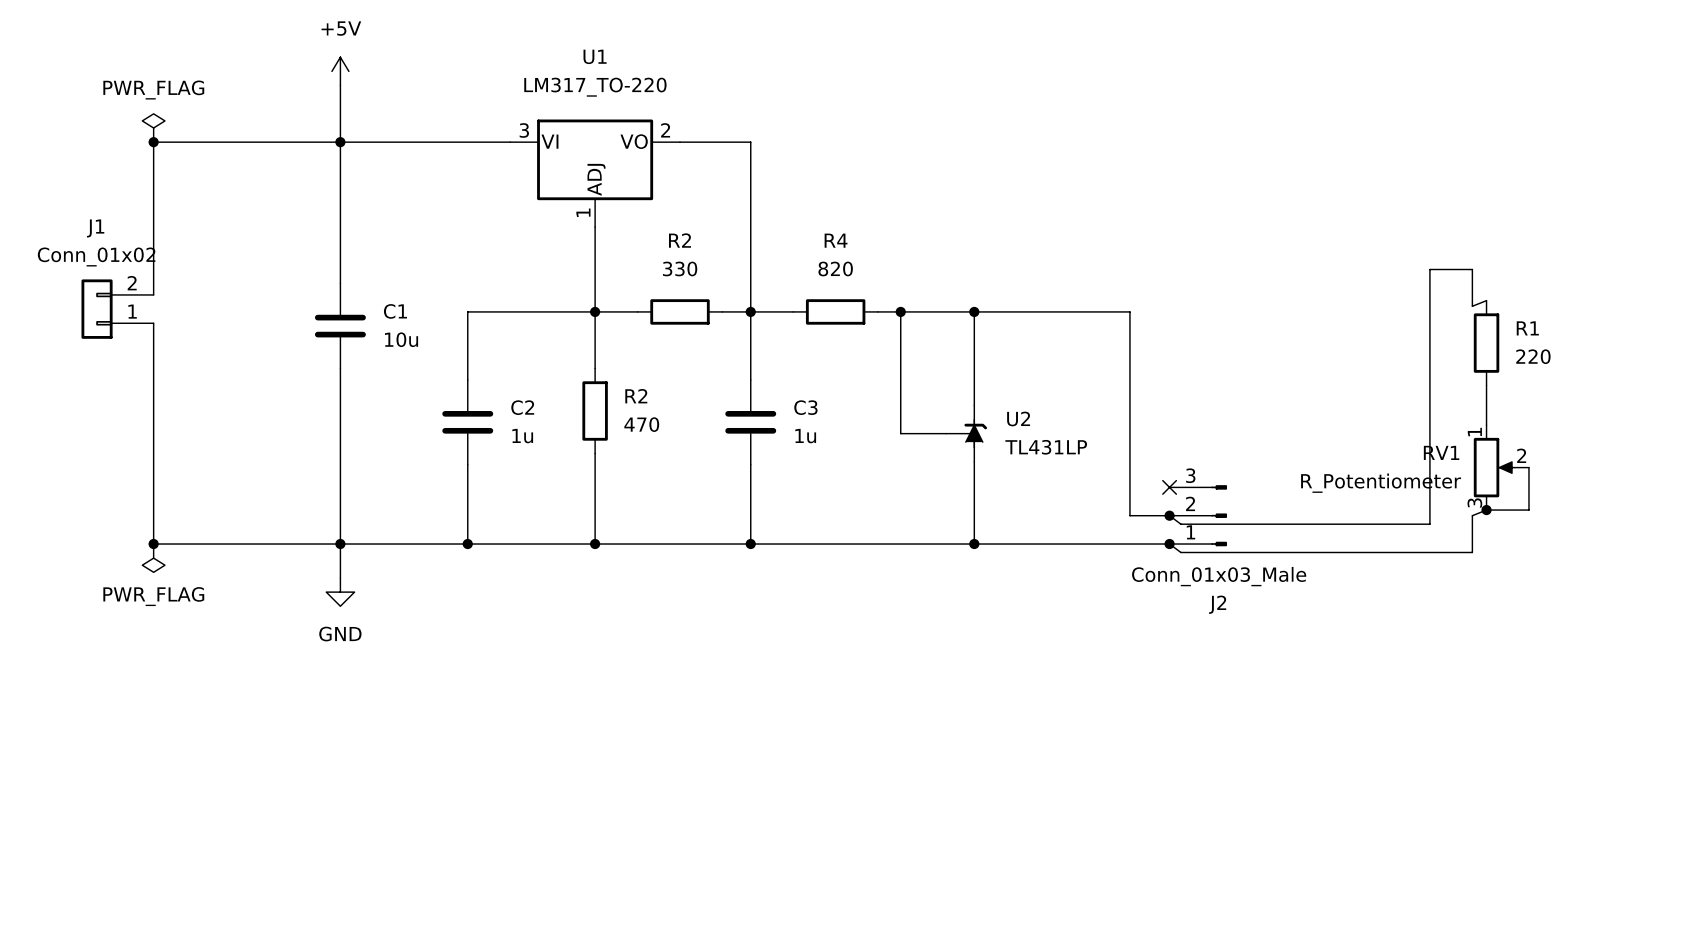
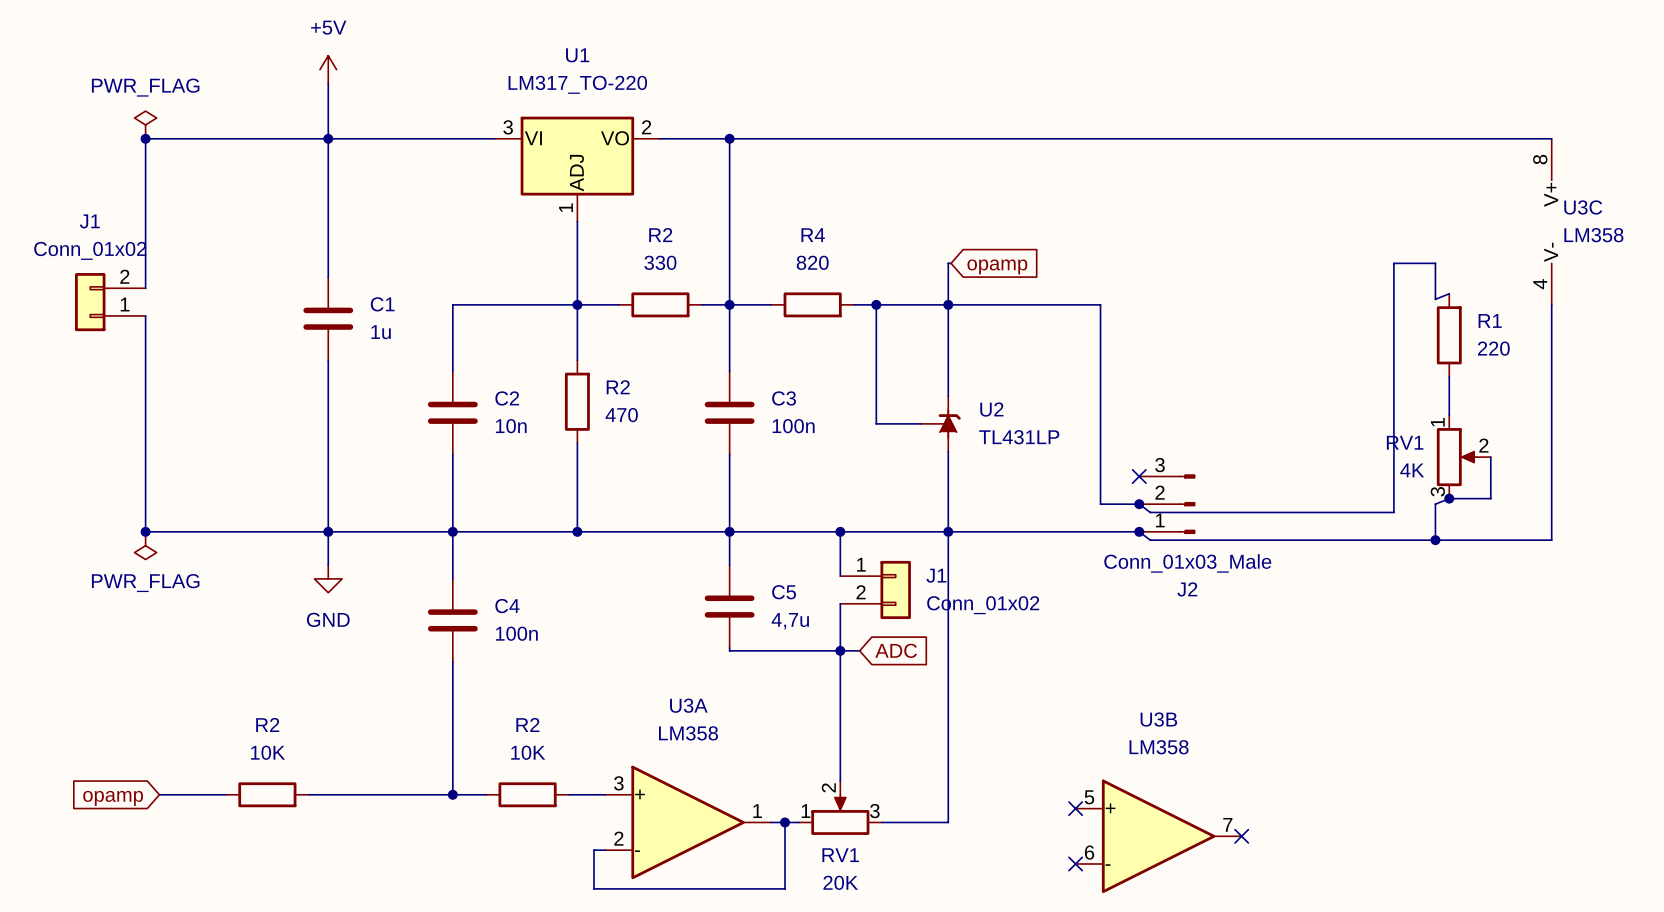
wire: none -> (729, 138) (1551, 138)
junction: none -> (729, 138)
U3C: none -> LM358 (1551, 221)
wire: none -> (951, 263) (948, 263) (948, 304)
global label: none -> opamp (997, 266)
wire: none -> (1551, 304) (1551, 540) (1435, 540)
C1 value: 10u (401, 339) -> 1u (381, 332)
C2 value: 1u (522, 436) -> 10n (511, 426)
C3 value: 1u (805, 436) -> 100n (793, 426)
RV1 value: R_Potentiometer (1381, 483) -> 4K (1412, 470)
wire: none -> (452, 531) (452, 578)
wire: none -> (729, 531) (729, 565)
wire: none -> (840, 531) (840, 576)
junction: none -> (840, 531)
wire: none -> (948, 531) (948, 822) (881, 822)
junction: none -> (1435, 540)
J1: none -> Conn_01x02 (875, 589)
wire: none -> (840, 603) (840, 780)
C5: none -> 4,7u (729, 606)
C4: none -> 100n (452, 620)
wire: none -> (729, 648) (729, 650) (859, 650)
junction: none -> (840, 650)
global label: none -> ADC (896, 650)
wire: none -> (452, 661) (452, 794)
wire: none -> (159, 794) (225, 794)
R2: none -> 10K (267, 794)
wire: none -> (308, 794) (486, 794)
junction: none -> (452, 794)
R2: none -> 10K (527, 794)
wire: none -> (569, 794) (605, 794)
global label: none -> opamp (113, 798)
RV1: none -> 20K (840, 807)
no-connect mark: none -> (1075, 808)
U3A: none -> LM358 (688, 822)
wire: none -> (771, 822) (798, 822)
wire: none -> (784, 822) (784, 888) (593, 888) (593, 850) (605, 850)
junction: none -> (784, 822)
U3B: none -> LM358 (1158, 836)
no-connect mark: none -> (1241, 836)
no-connect mark: none -> (1075, 863)

